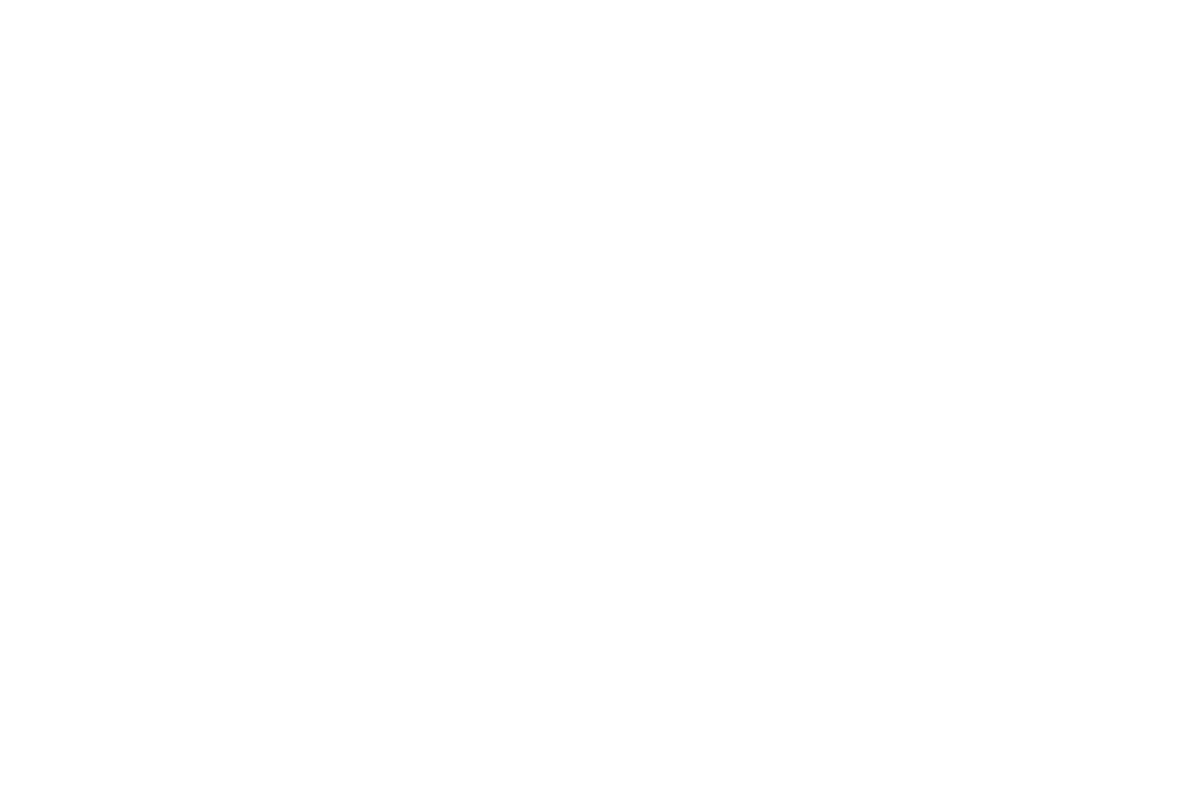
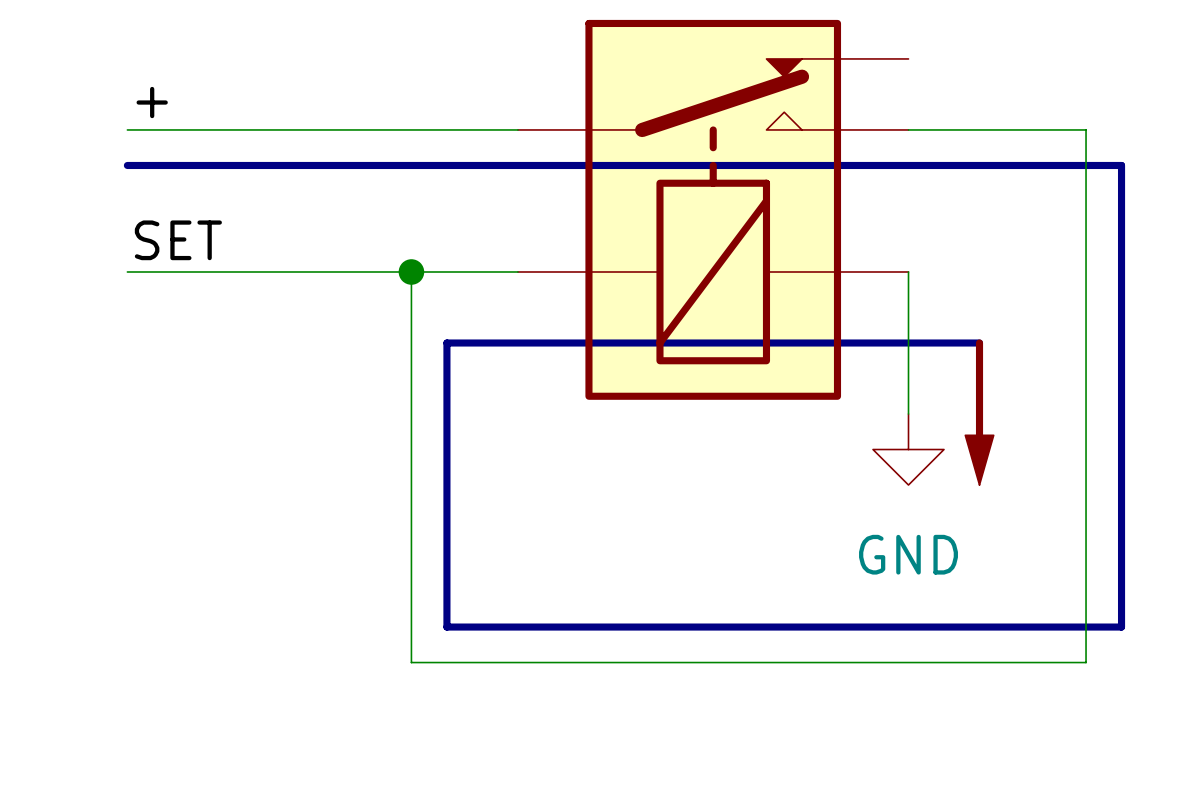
label: none -> + (152, 102)
wire: none -> (127, 129) (517, 129)
wire: none -> (908, 129) (1086, 129) (1086, 662) (411, 662) (411, 271)
line: none -> (127, 165) (1121, 165) (1121, 627) (446, 627) (446, 343) (979, 343) (979, 449)
part: none -> (713, 209)
label: none -> SET (178, 240)
wire: none -> (127, 271) (517, 271)
junction: none -> (411, 271)
wire: none -> (908, 271) (908, 414)
power symbol: none -> (979, 412)
power symbol: none -> GND (908, 449)

